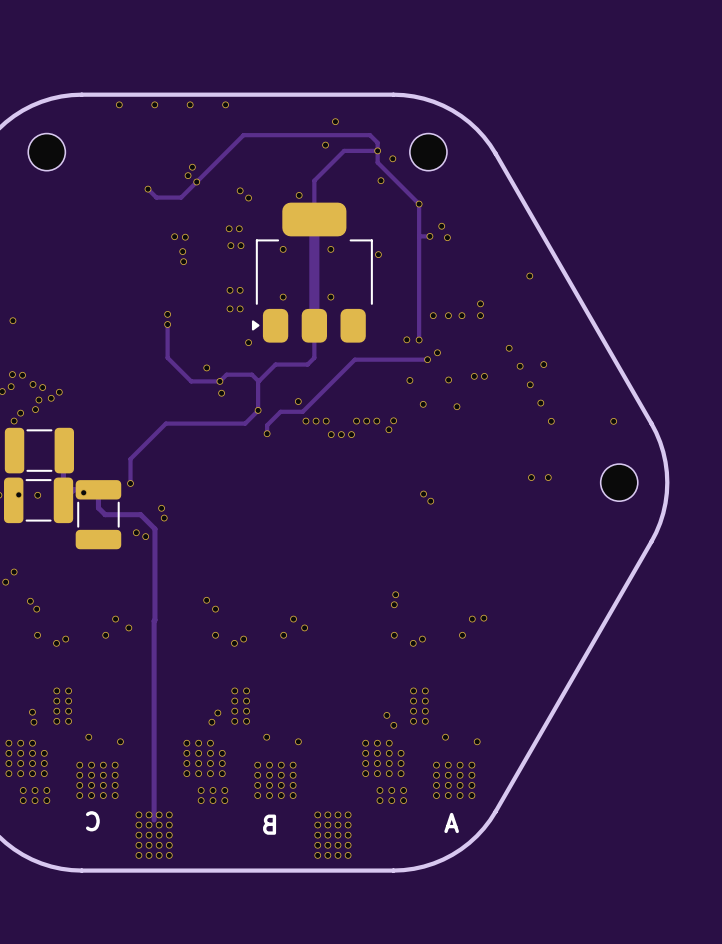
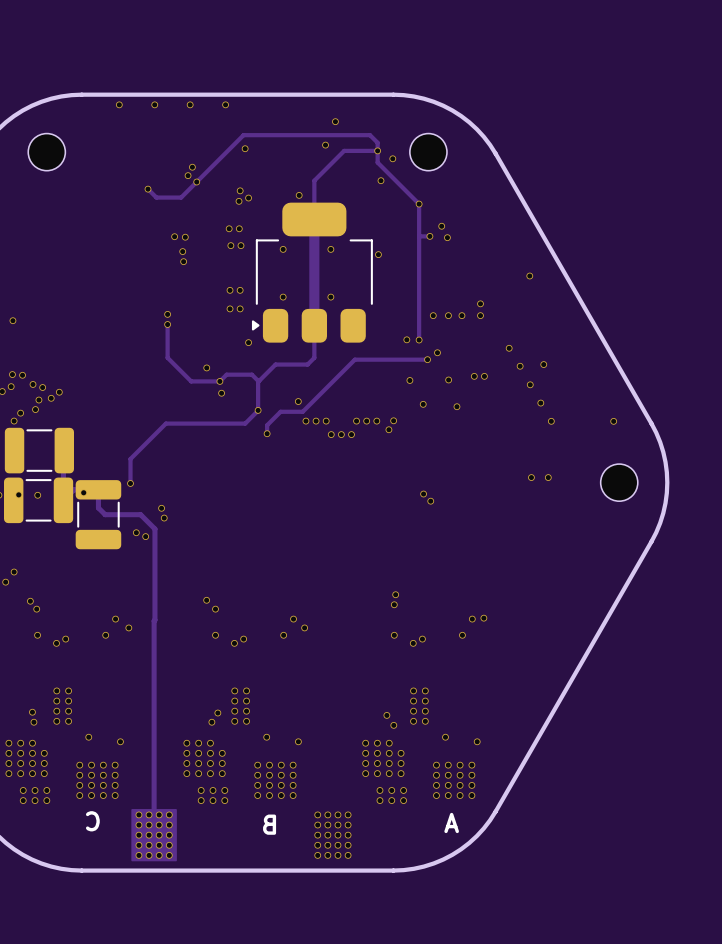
via: none -> (245, 148)
via: none -> (239, 201)
drawing: none -> [131, 809, 177, 862]

